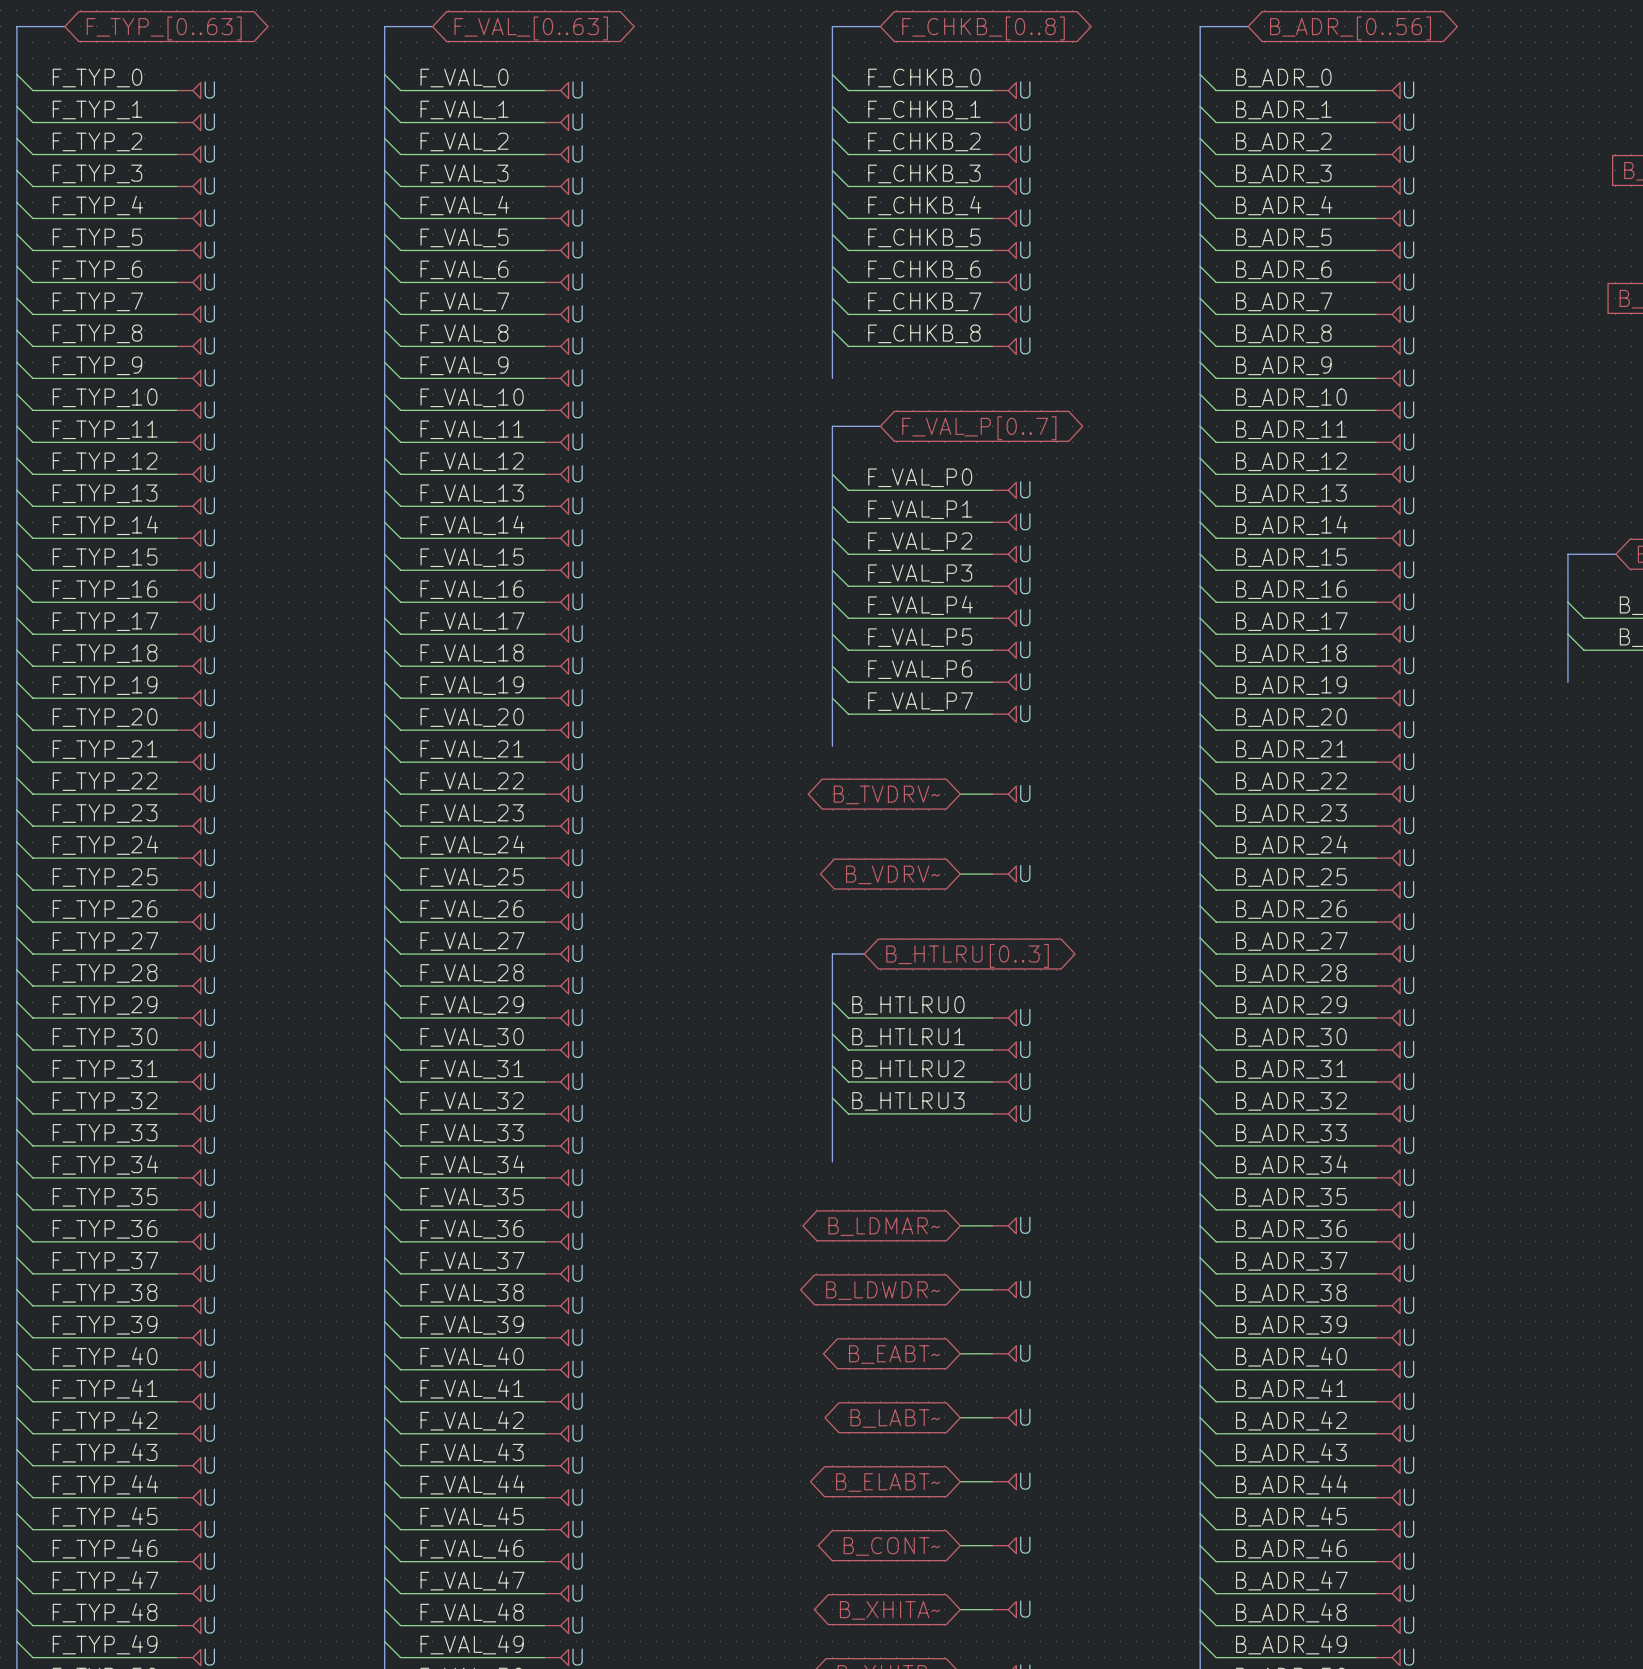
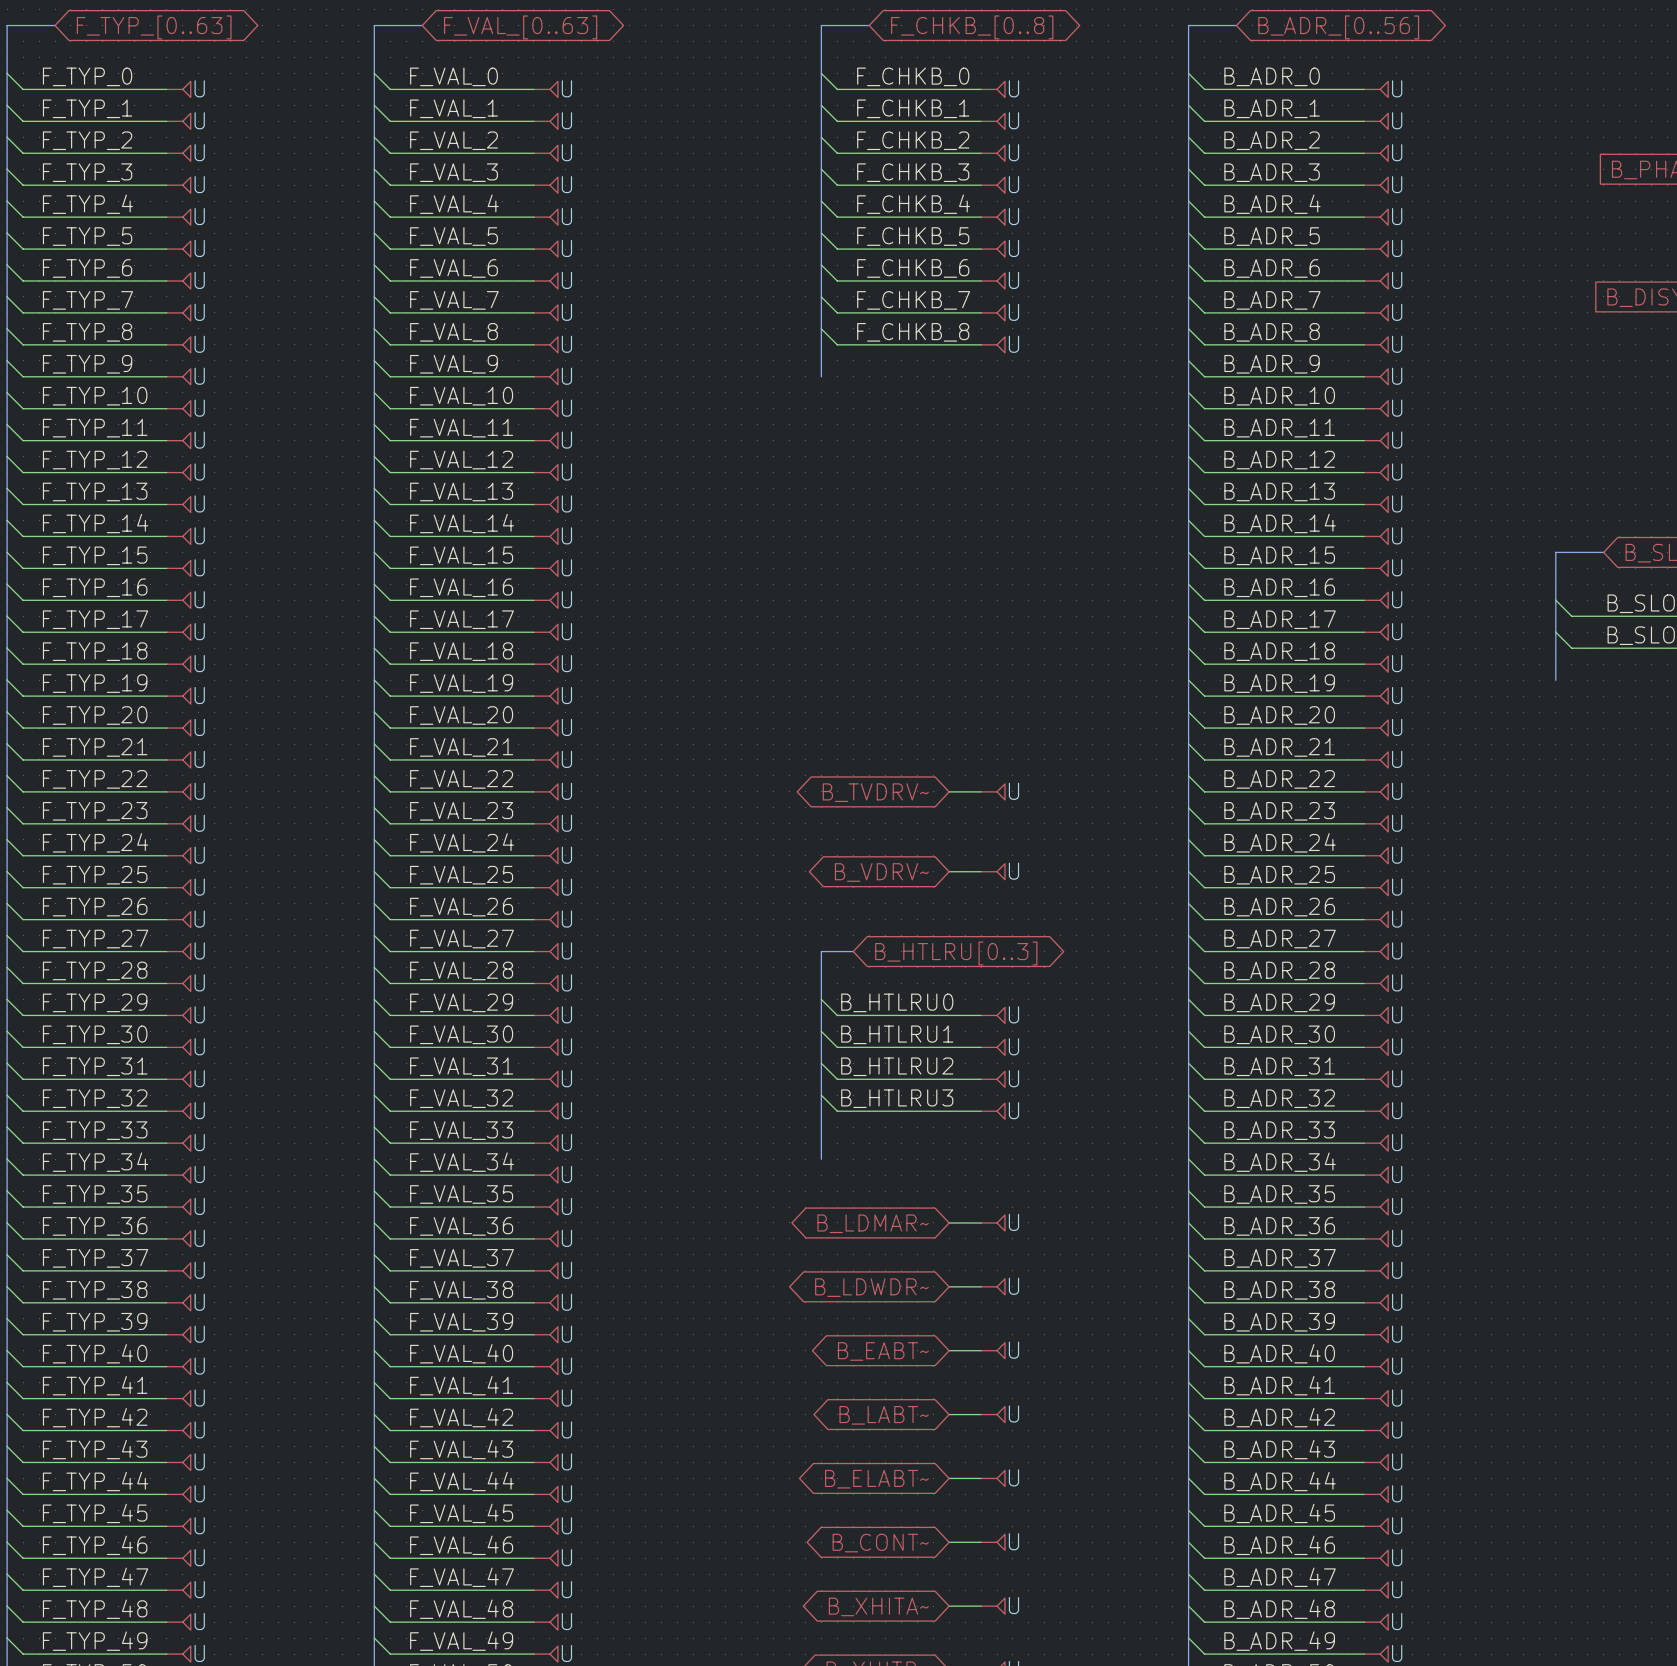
bus: (880, 426) (832, 426) (832, 746) -> none
global label: F_VAL_P[0..7] (979, 428) -> none
wire: (832, 474) (848, 490) (992, 490) -> none
label: F_VAL_P0 (920, 477) -> none
U: (1004, 490) -> none
wire: (832, 506) (848, 522) (992, 522) -> none
label: F_VAL_P1 (920, 509) -> none
U: (1004, 522) -> none
wire: (832, 538) (848, 554) (992, 554) -> none
label: F_VAL_P2 (920, 541) -> none
U: (1004, 554) -> none
wire: (832, 570) (848, 586) (992, 586) -> none
label: F_VAL_P3 (920, 573) -> none
U: (1004, 586) -> none
wire: (832, 602) (848, 618) (992, 618) -> none
label: F_VAL_P4 (920, 605) -> none
U: (1004, 618) -> none
wire: (832, 634) (848, 650) (992, 650) -> none
label: F_VAL_P5 (920, 637) -> none
U: (1004, 650) -> none
wire: (832, 666) (848, 682) (992, 682) -> none
label: F_VAL_P6 (920, 669) -> none
U: (1004, 682) -> none
wire: (832, 698) (848, 714) (992, 714) -> none
label: F_VAL_P7 (920, 701) -> none
U: (1004, 714) -> none

